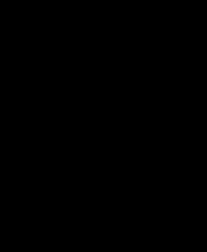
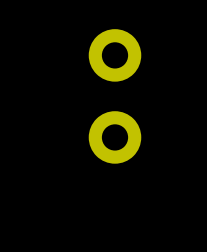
part: none -> (115, 96)

